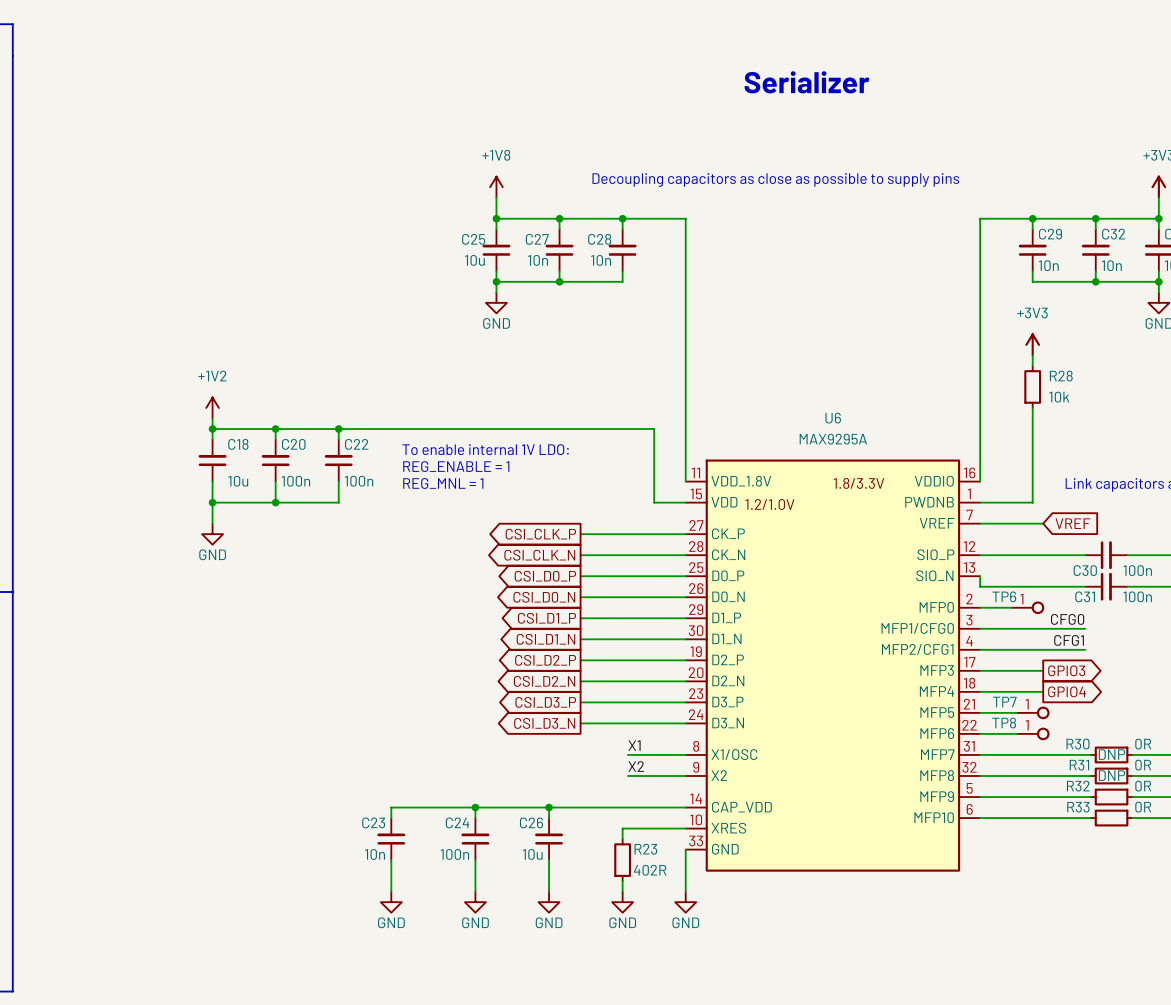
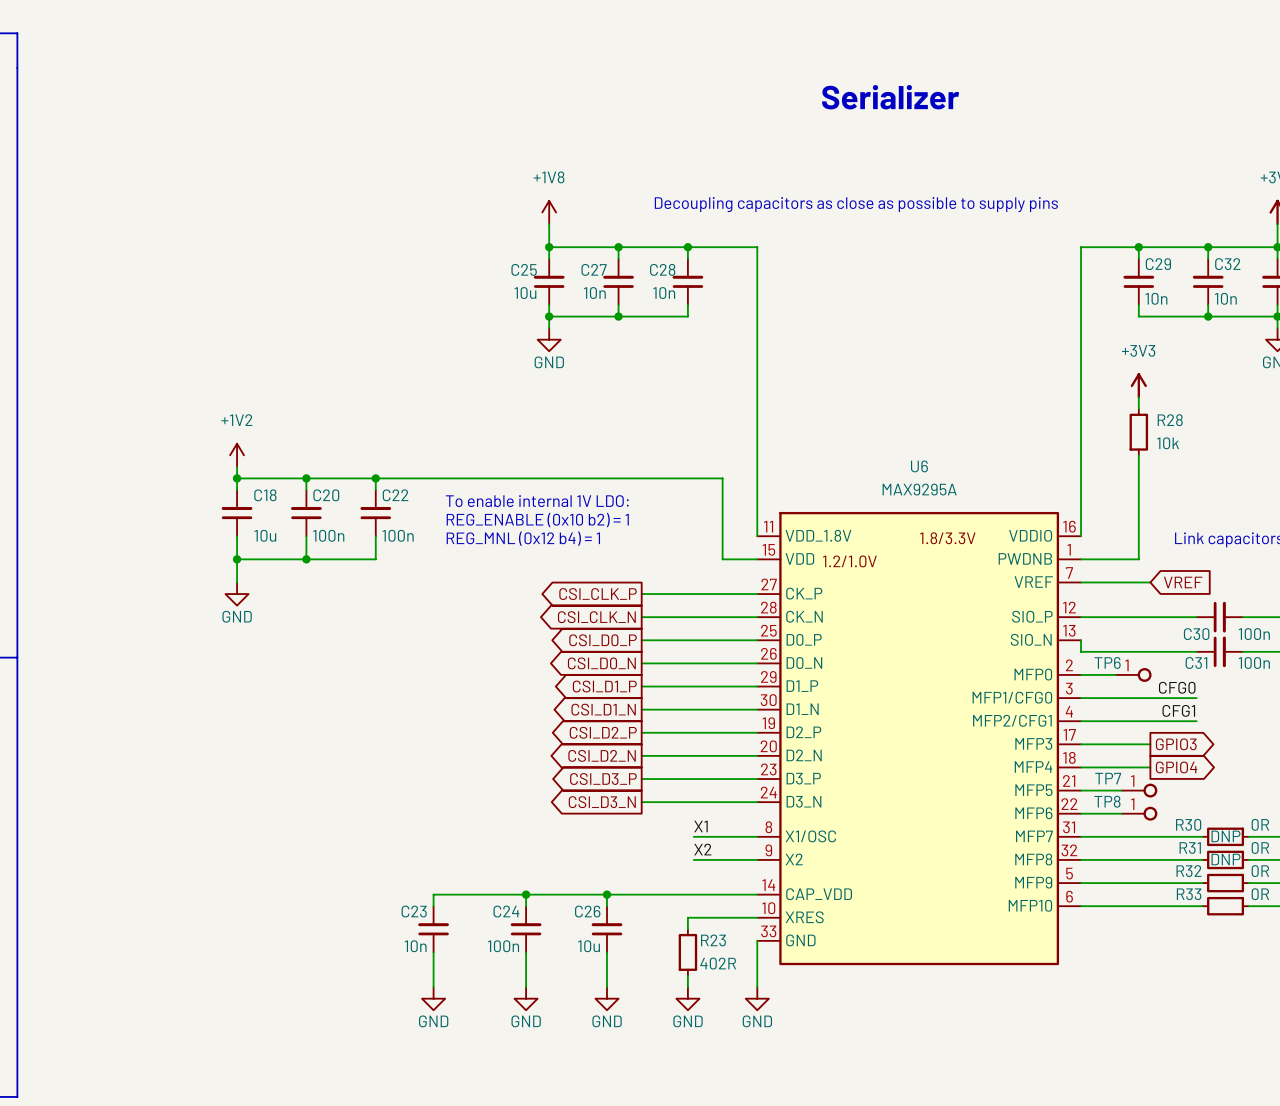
text: REG_ENABLE = 1 (456, 466) -> REG_ENABLE (0x10 b2) = 1 (537, 520)
text: REG_MNL = 1 (443, 483) -> REG_MNL (0x12 b4) = 1 (523, 538)

